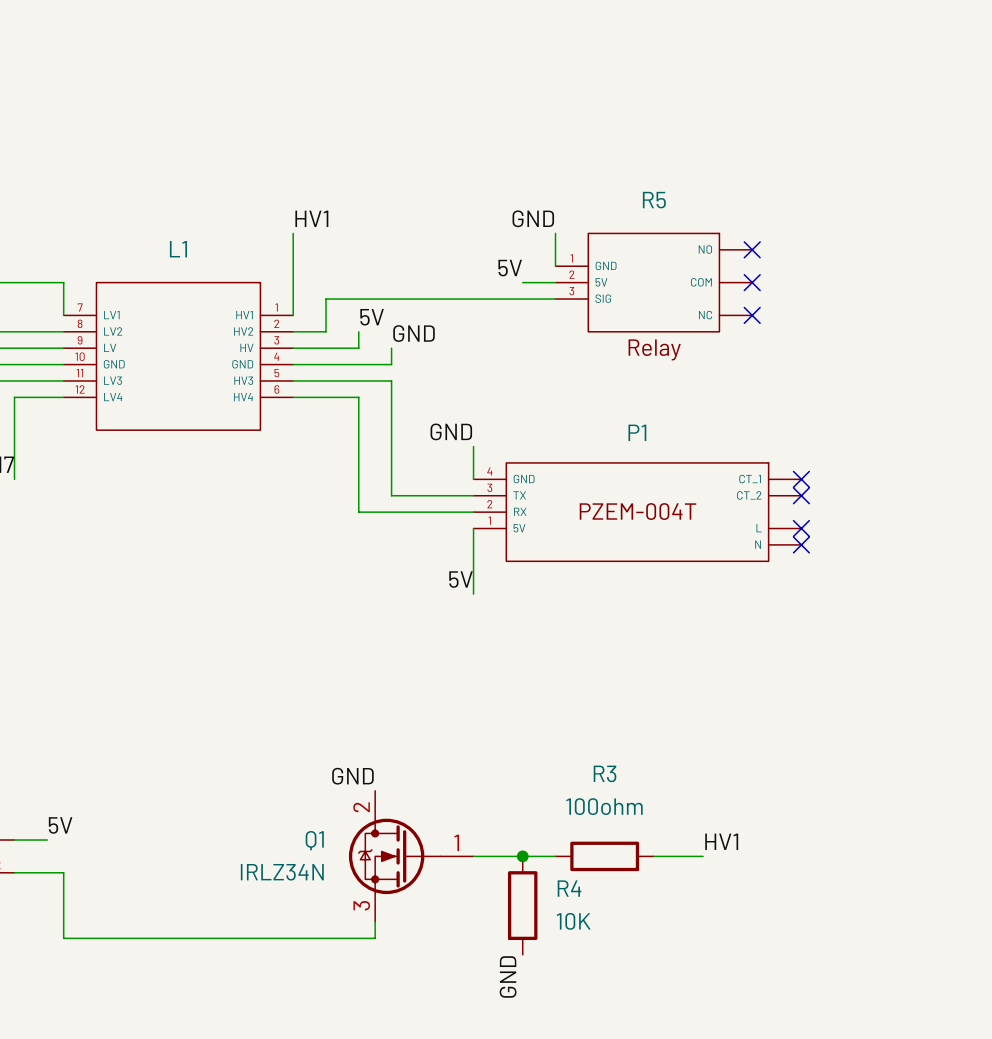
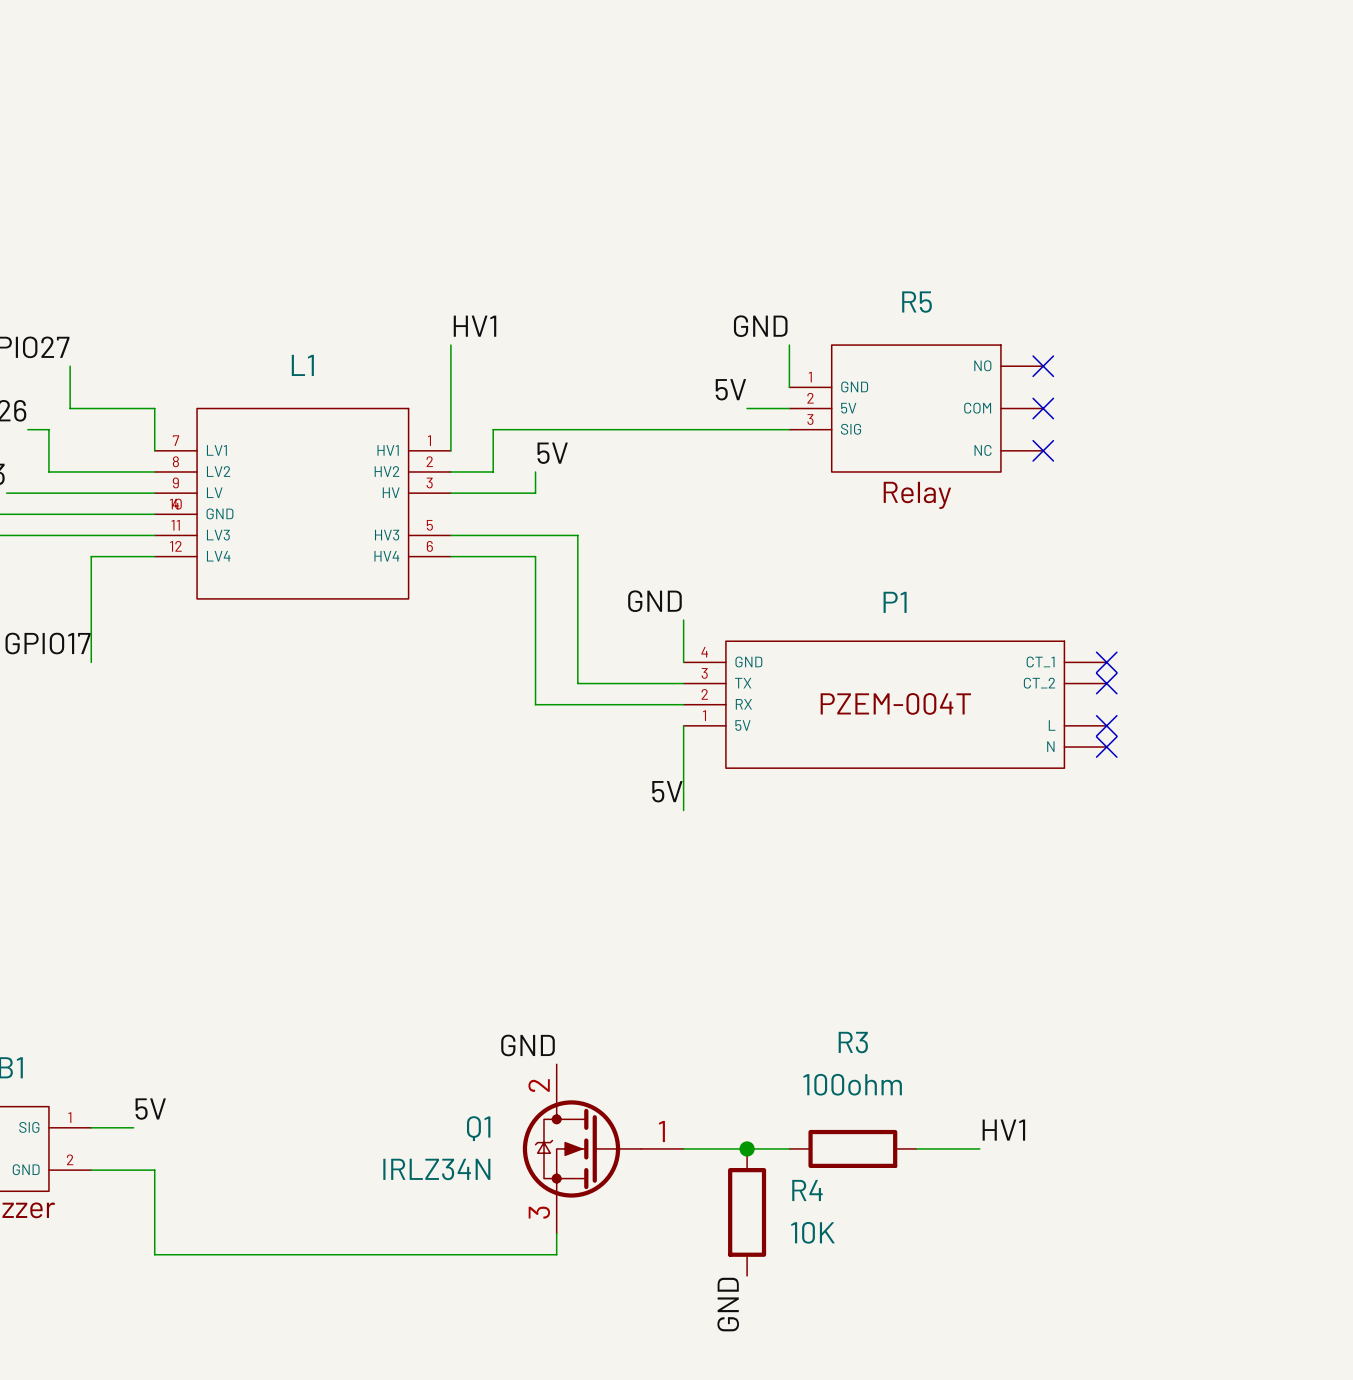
L1 symbol: [63, 282, 294, 431] -> [154, 408, 451, 599]
label: GND (414, 333) -> none
wire: (391, 348) (391, 364) (293, 364) -> none

